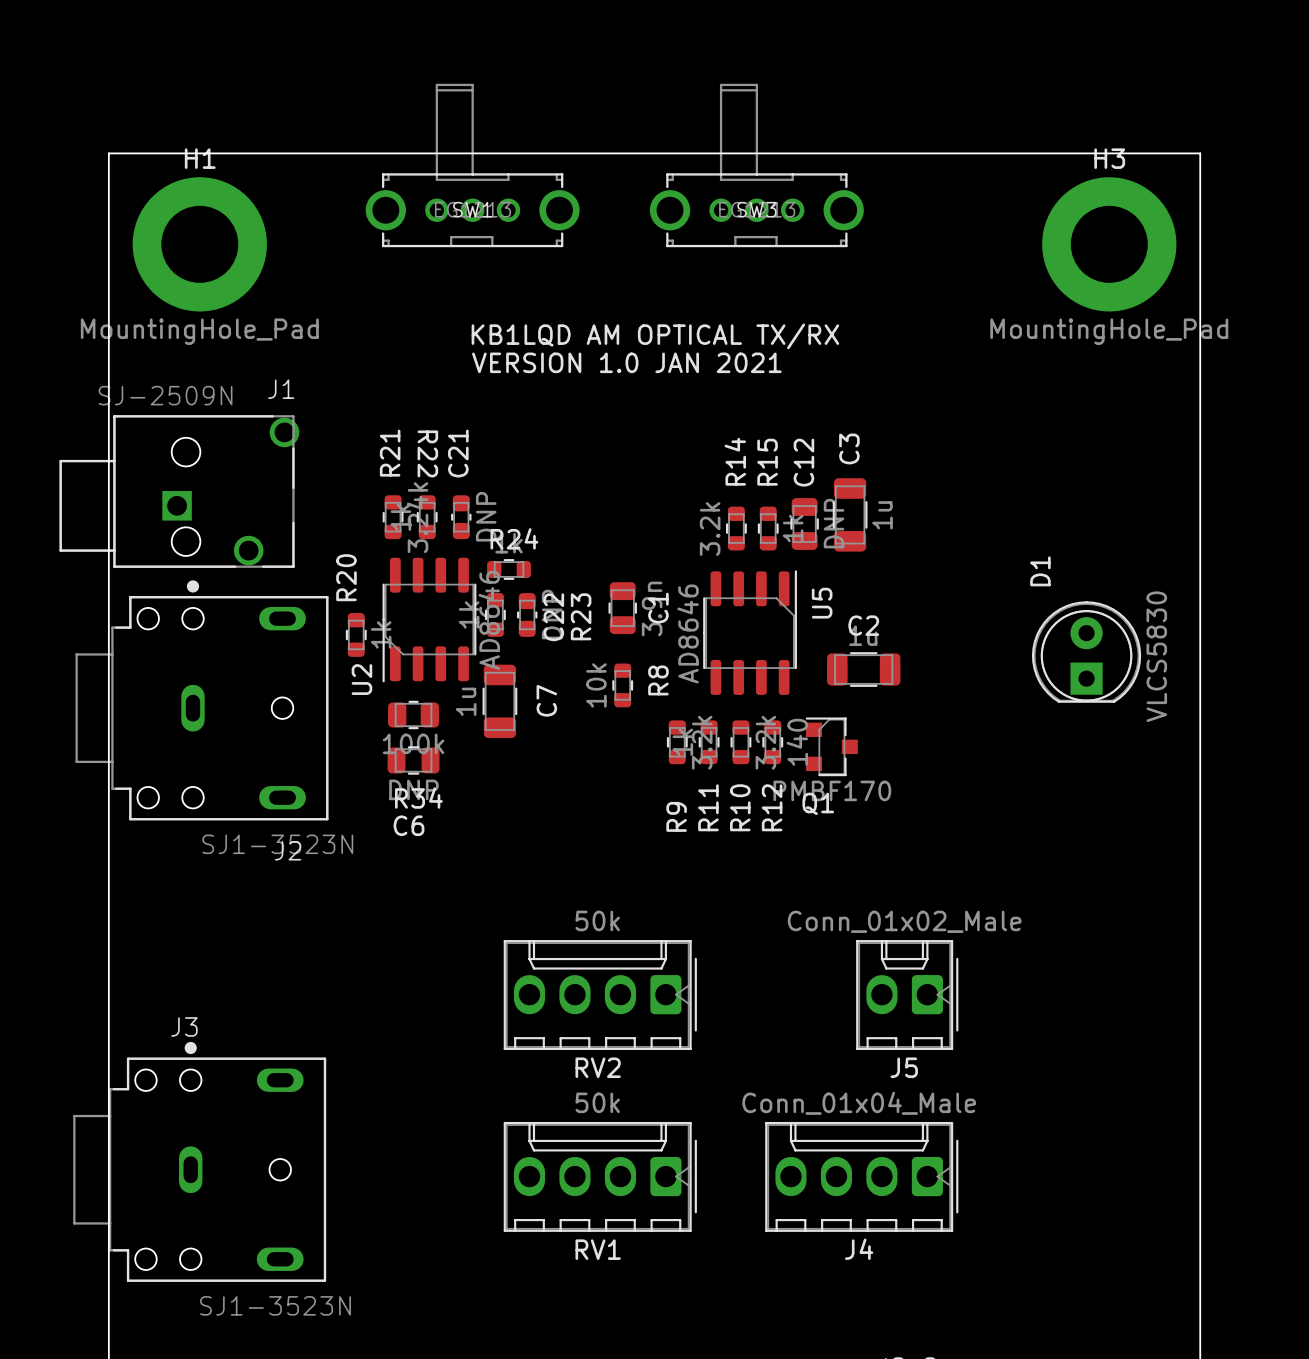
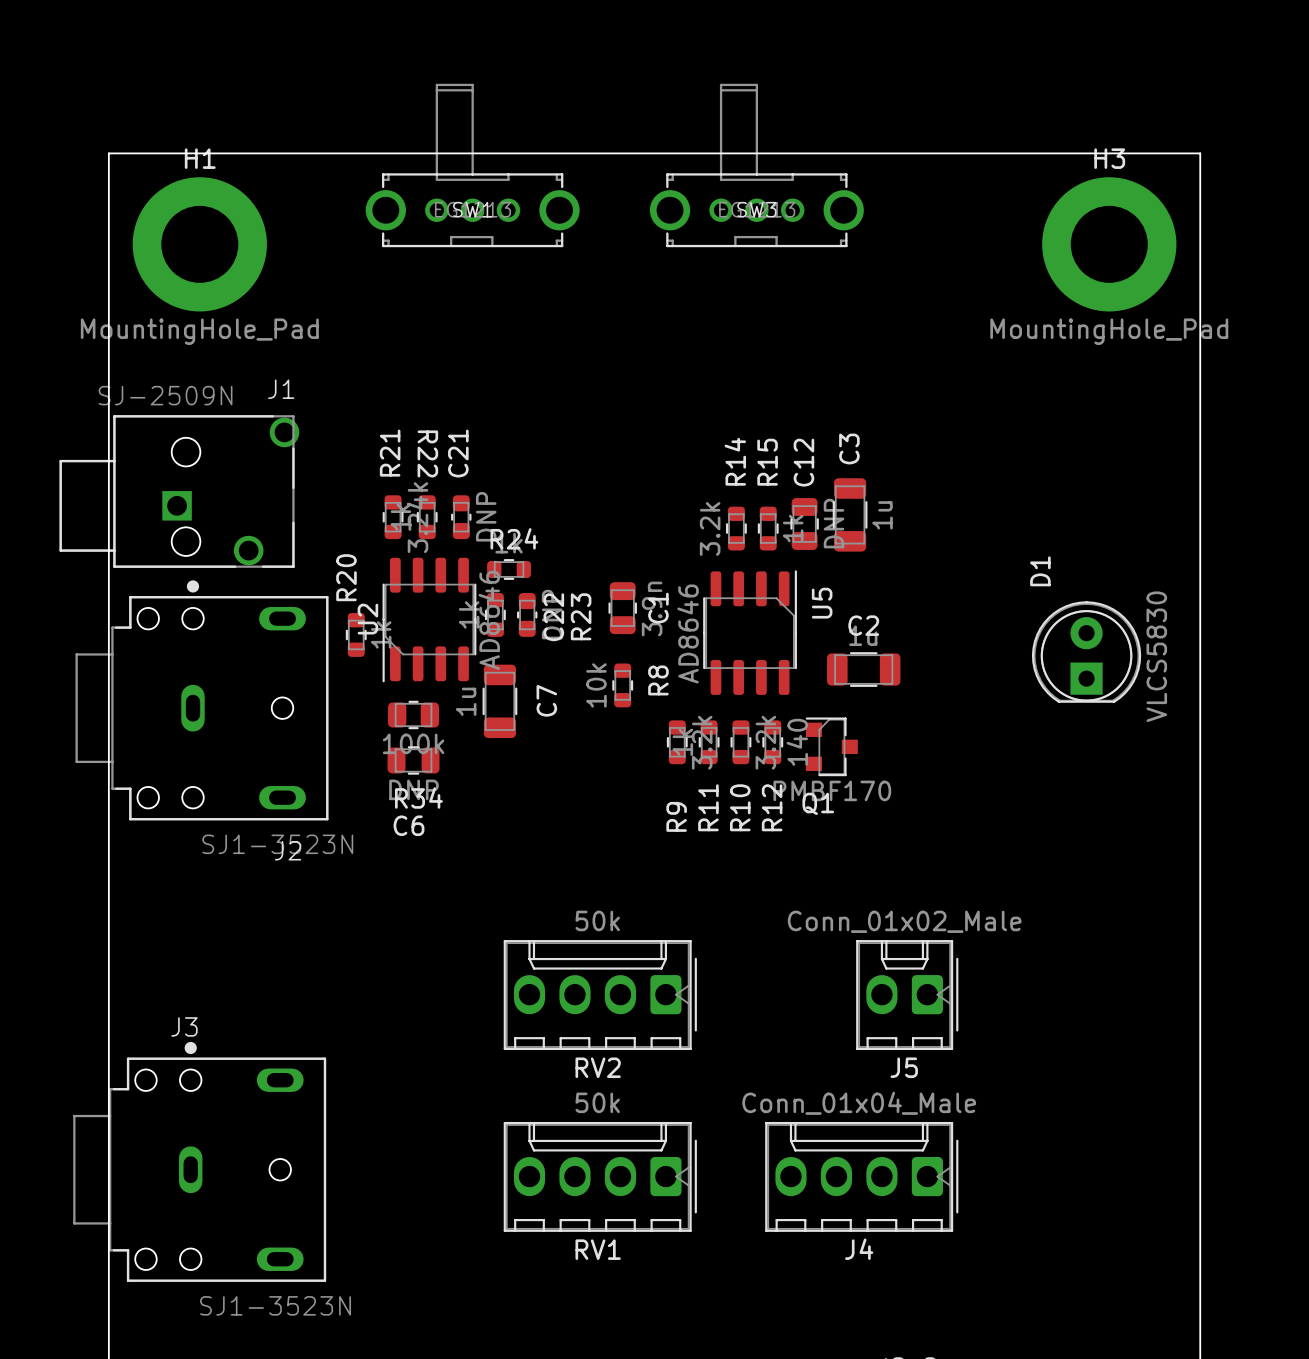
text: KB1LQD AM OPTICAL TX/RX (655, 336) -> none
text: VERSION 1.0 JAN 2021 (626, 362) -> none
U2 name position: U2 (361, 679) -> U2 (367, 619)

